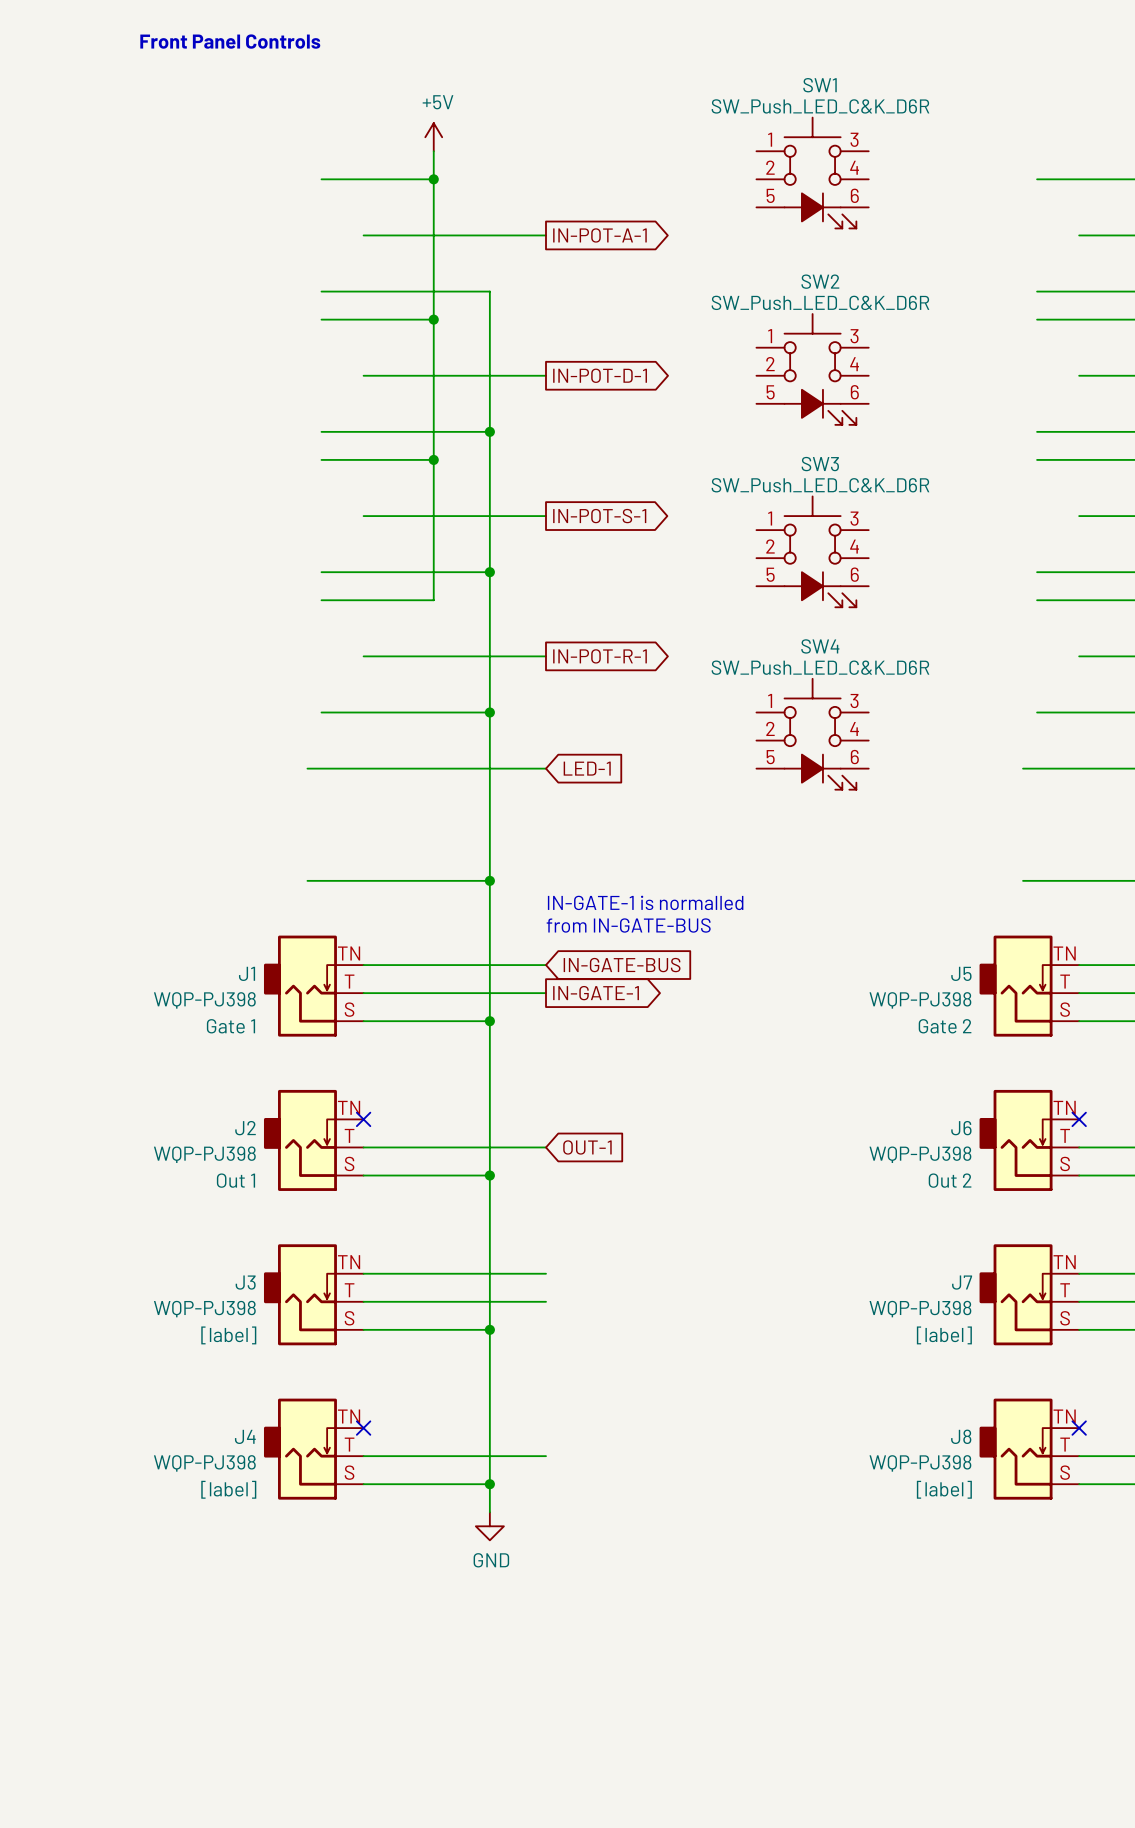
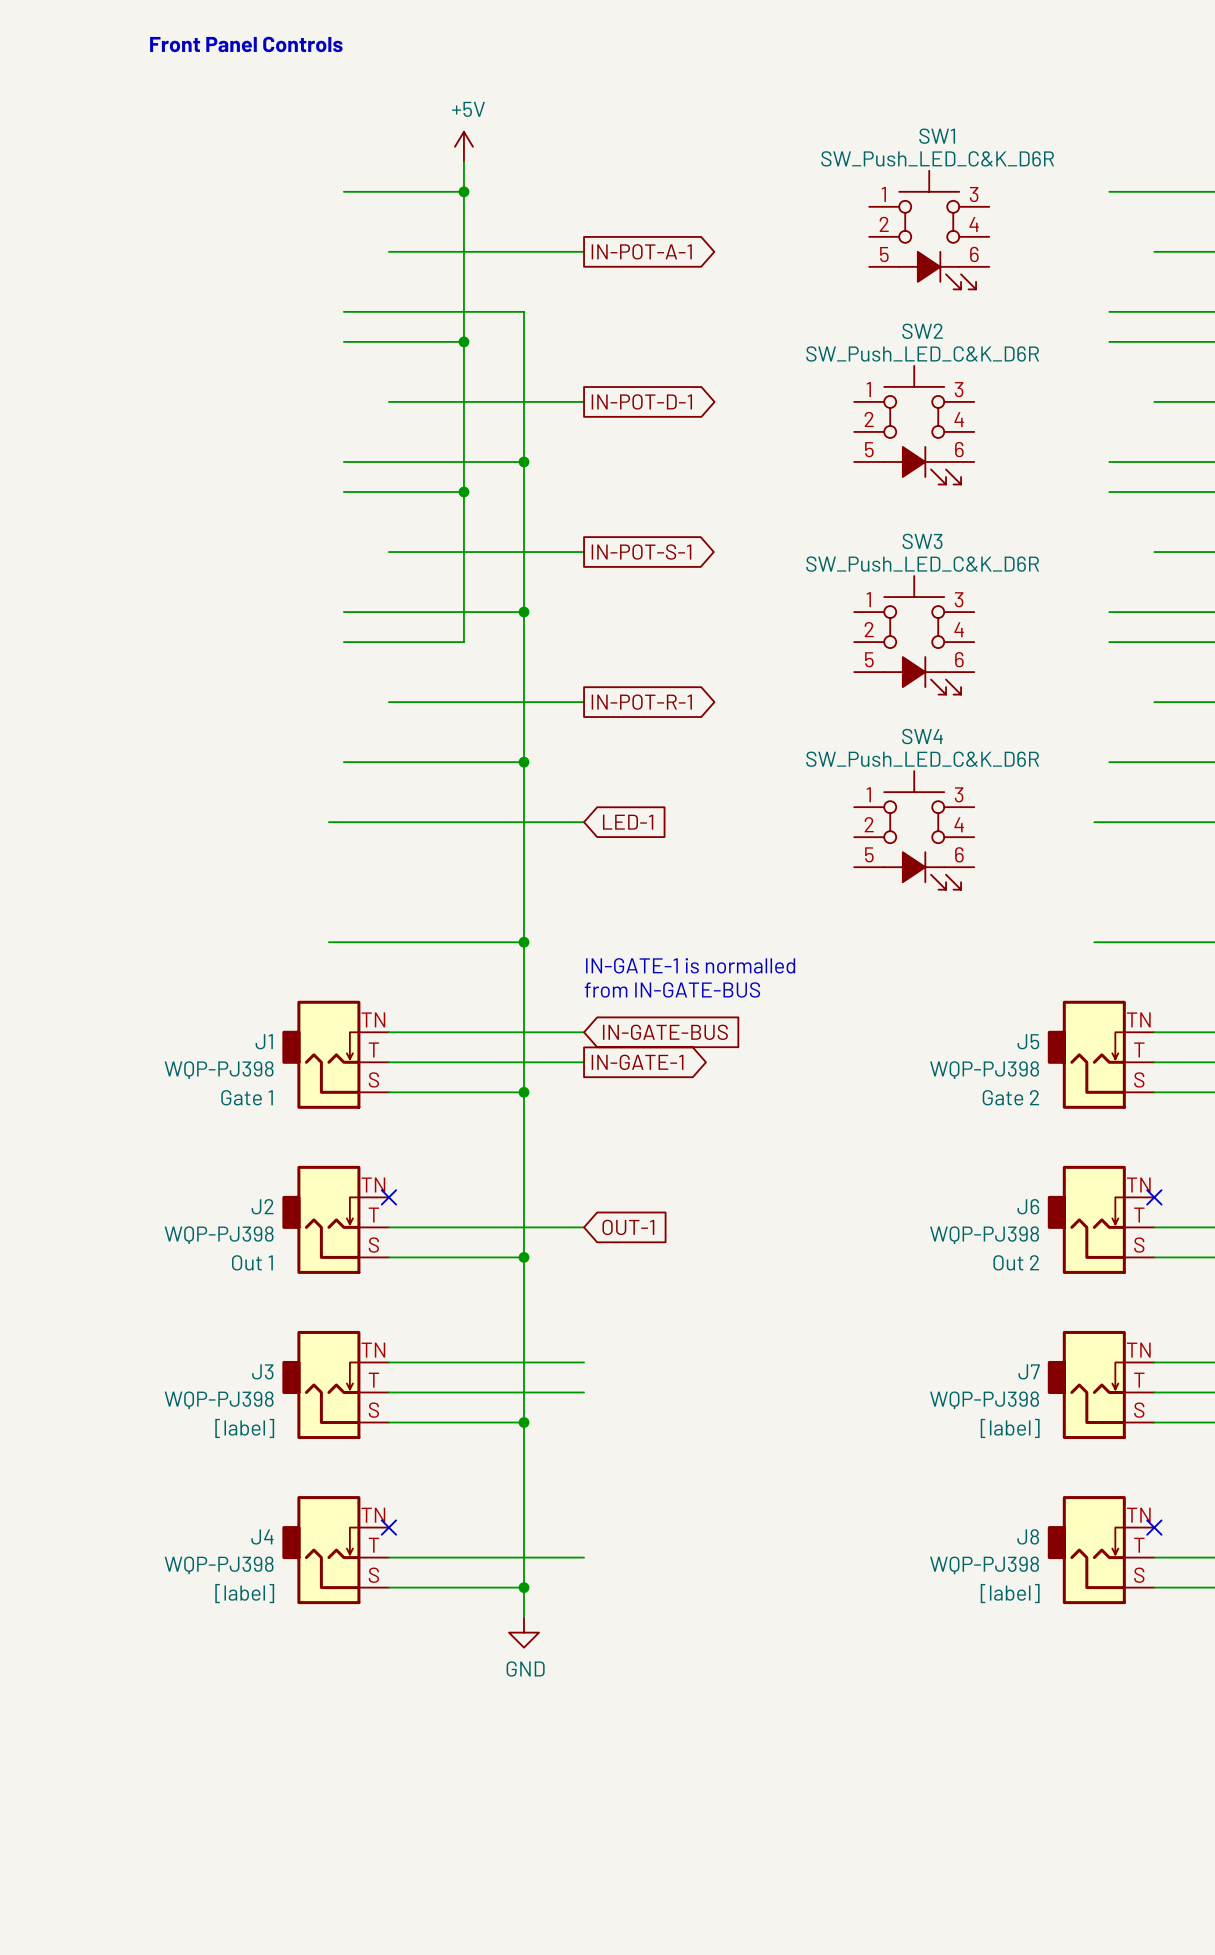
SW1 position: (812, 173) -> (929, 230)
SW2 position: (812, 369) -> (914, 425)
SW3 position: (812, 551) -> (914, 635)
SW4 position: (812, 734) -> (914, 830)

